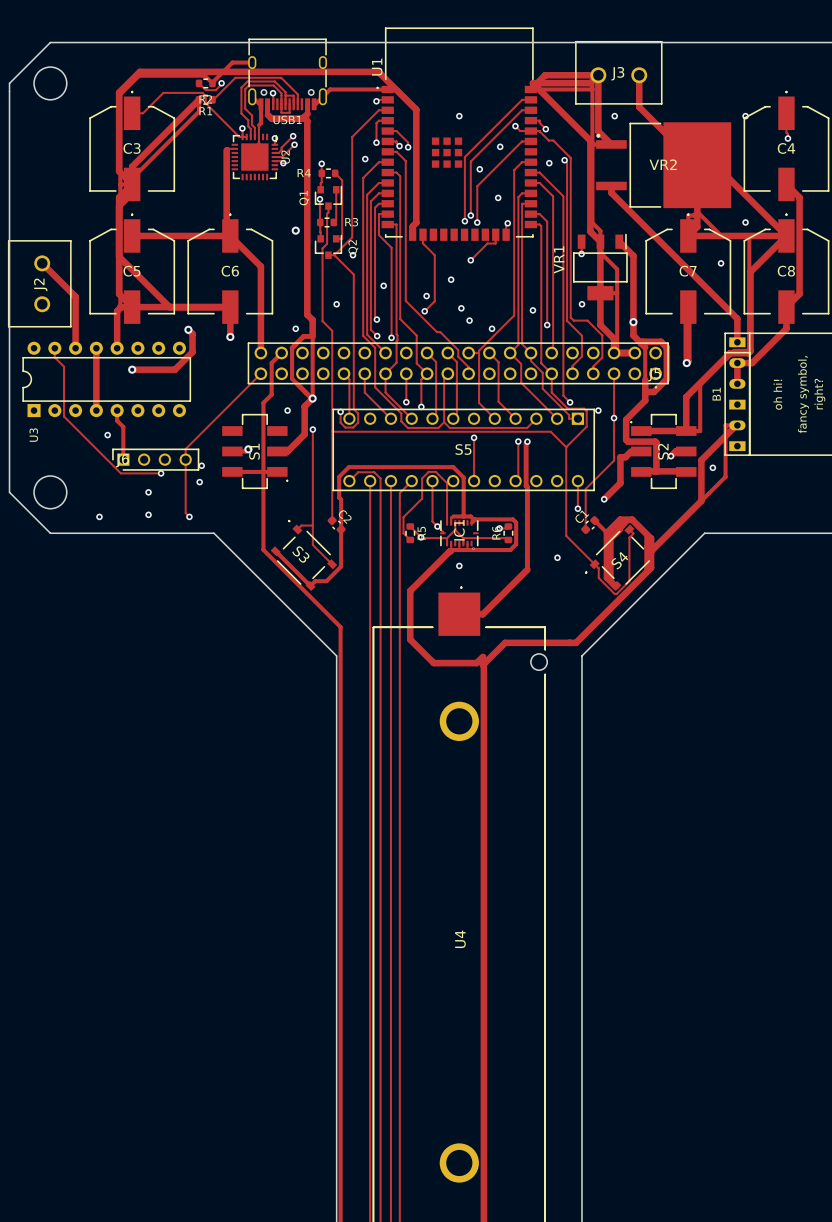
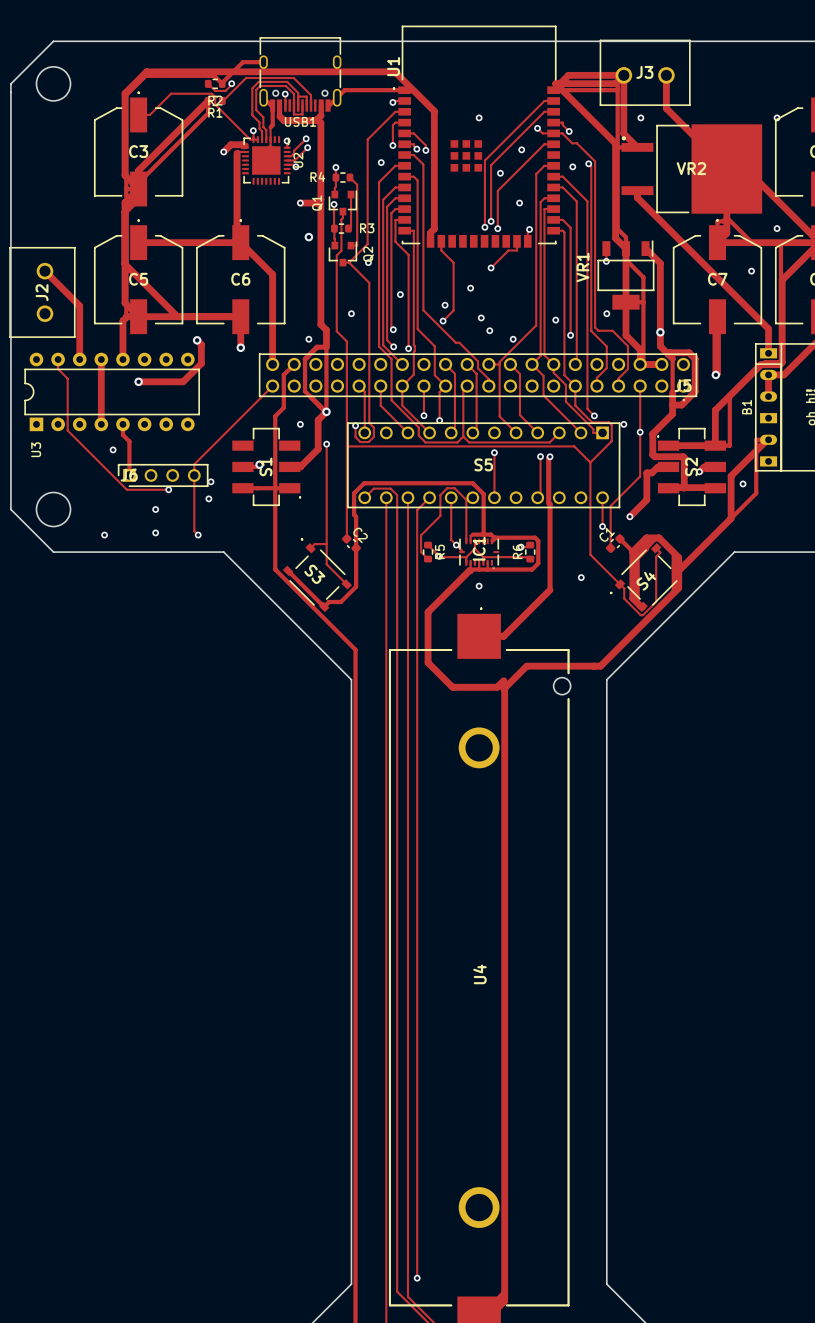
track: none -> (245, 145) (230, 144) (223, 151)
via: none -> (223, 151)
track: none -> (320, 199) (317, 203) (300, 203)
via: none -> (300, 203)

